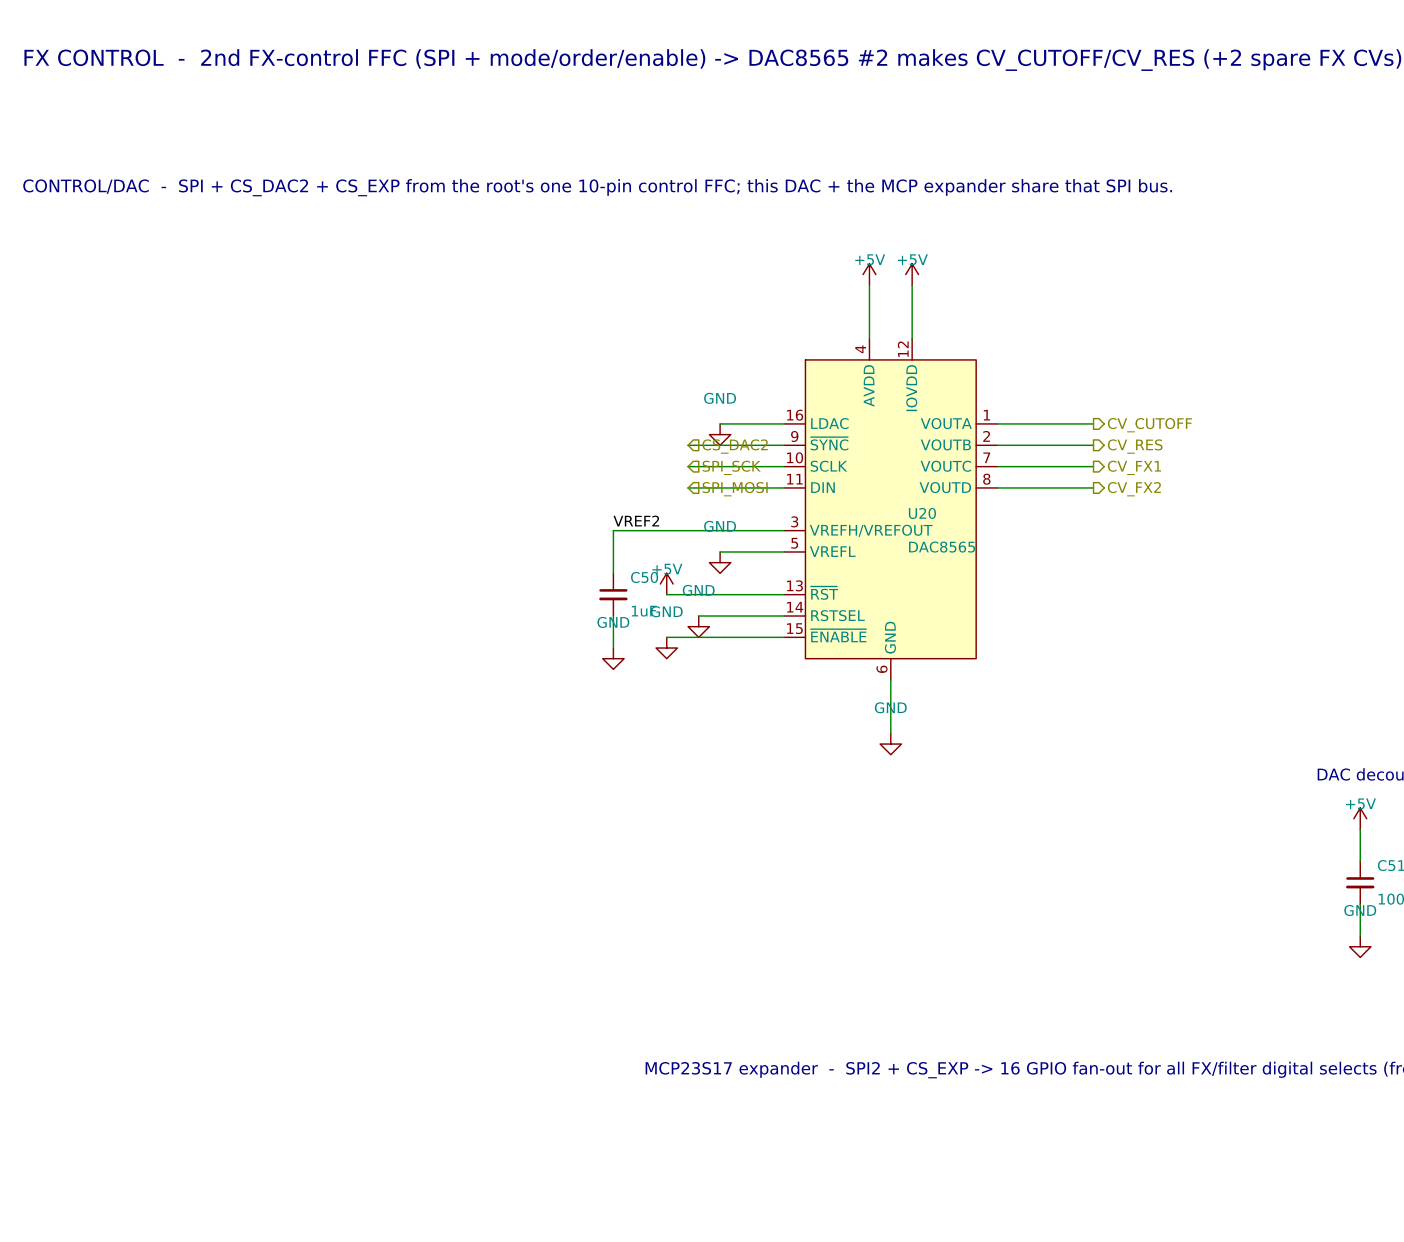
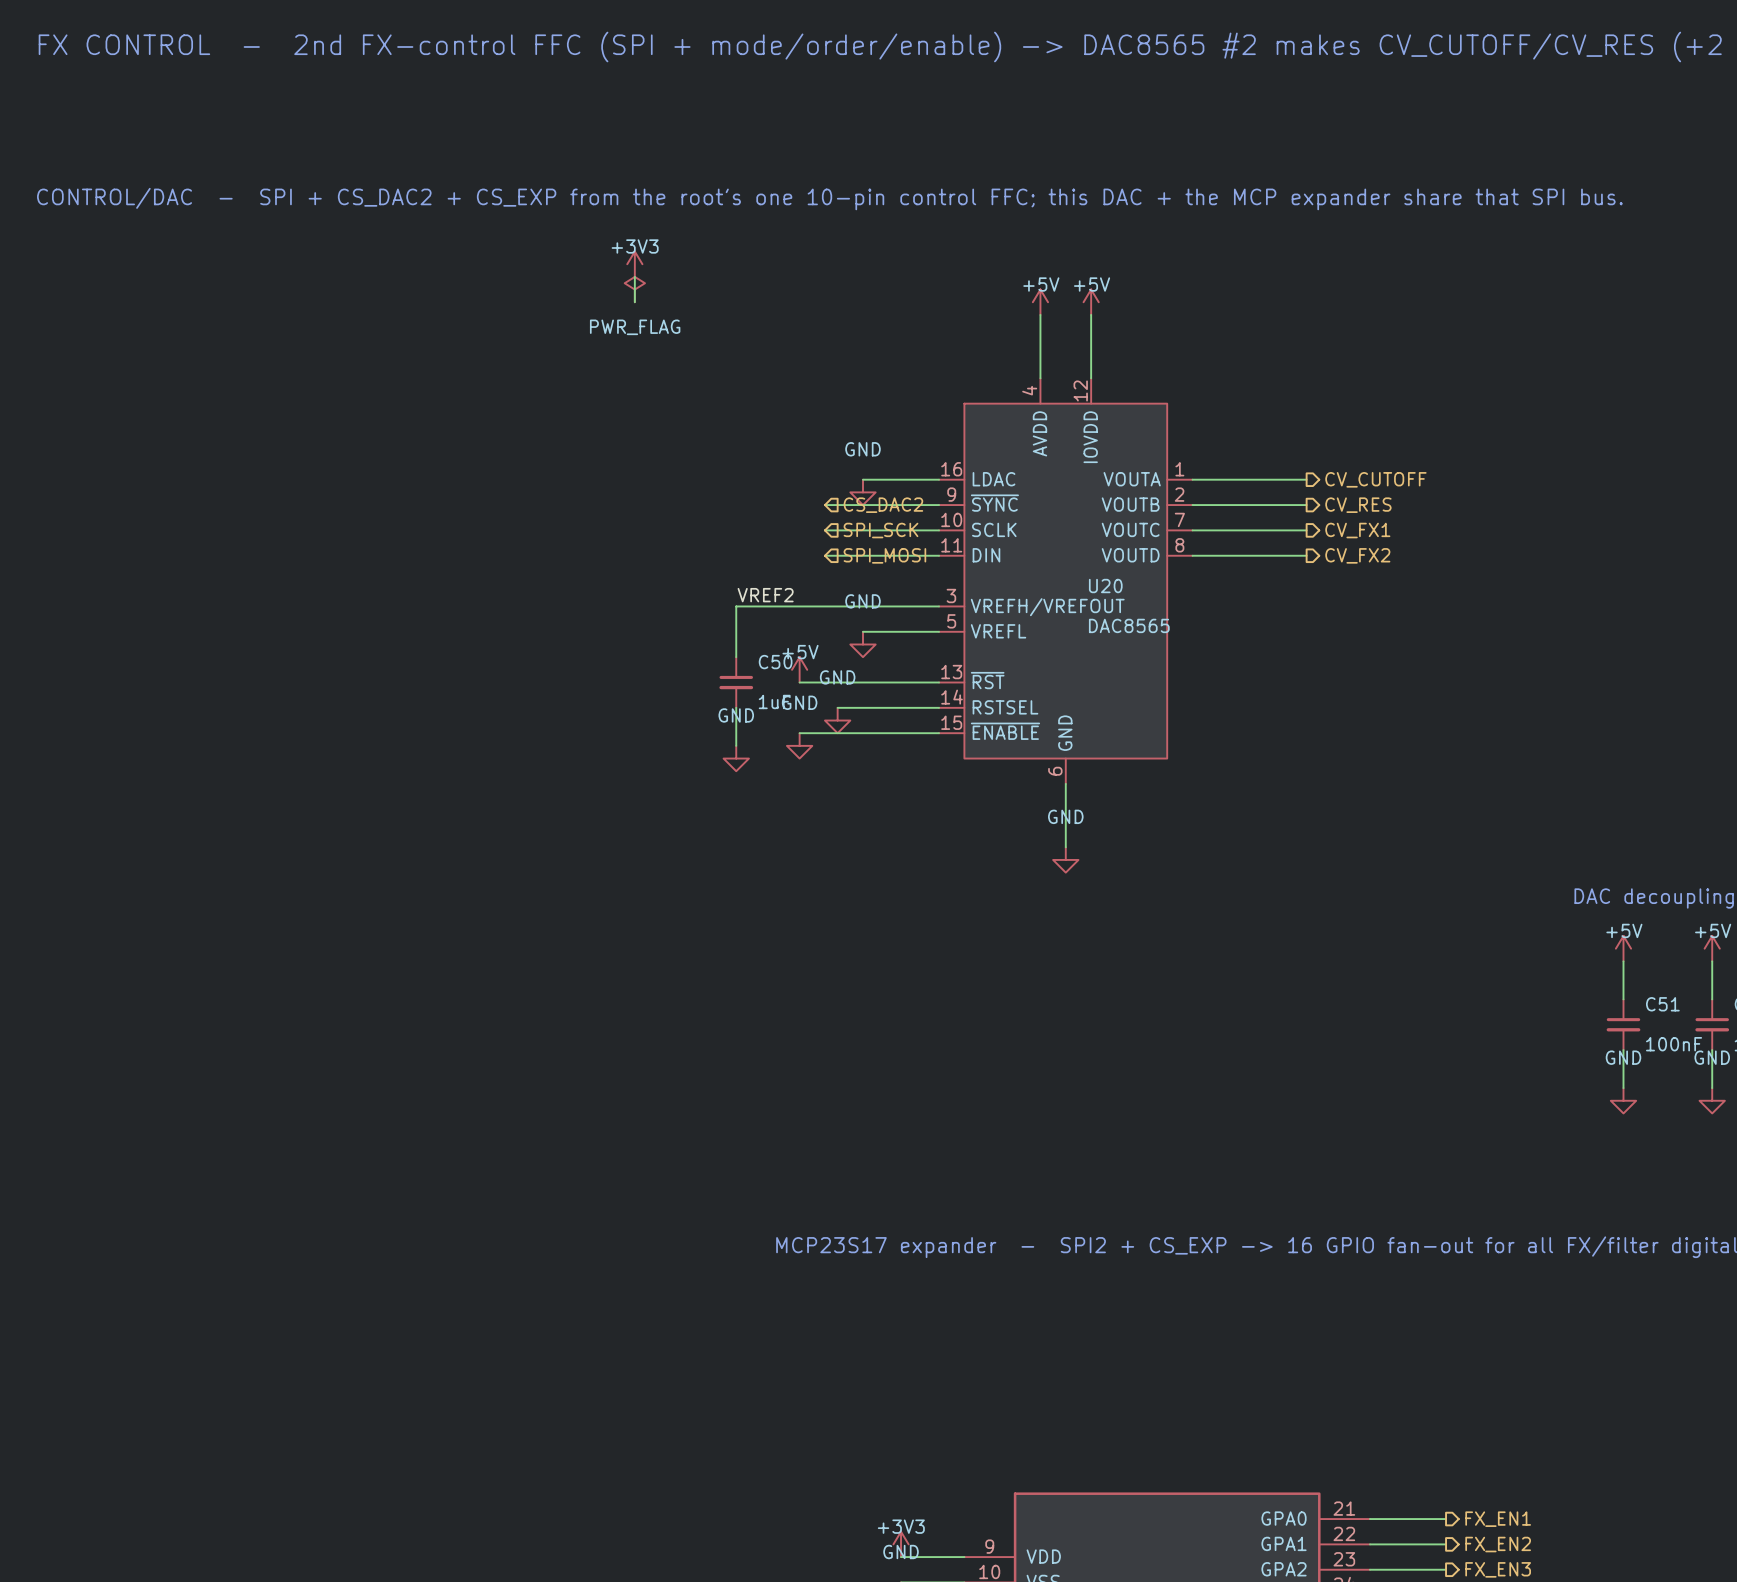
power symbol: none -> +3V3 (634, 264)
wire: none -> (634, 276) (634, 302)
power symbol: none -> PWR_FLAG (634, 289)

